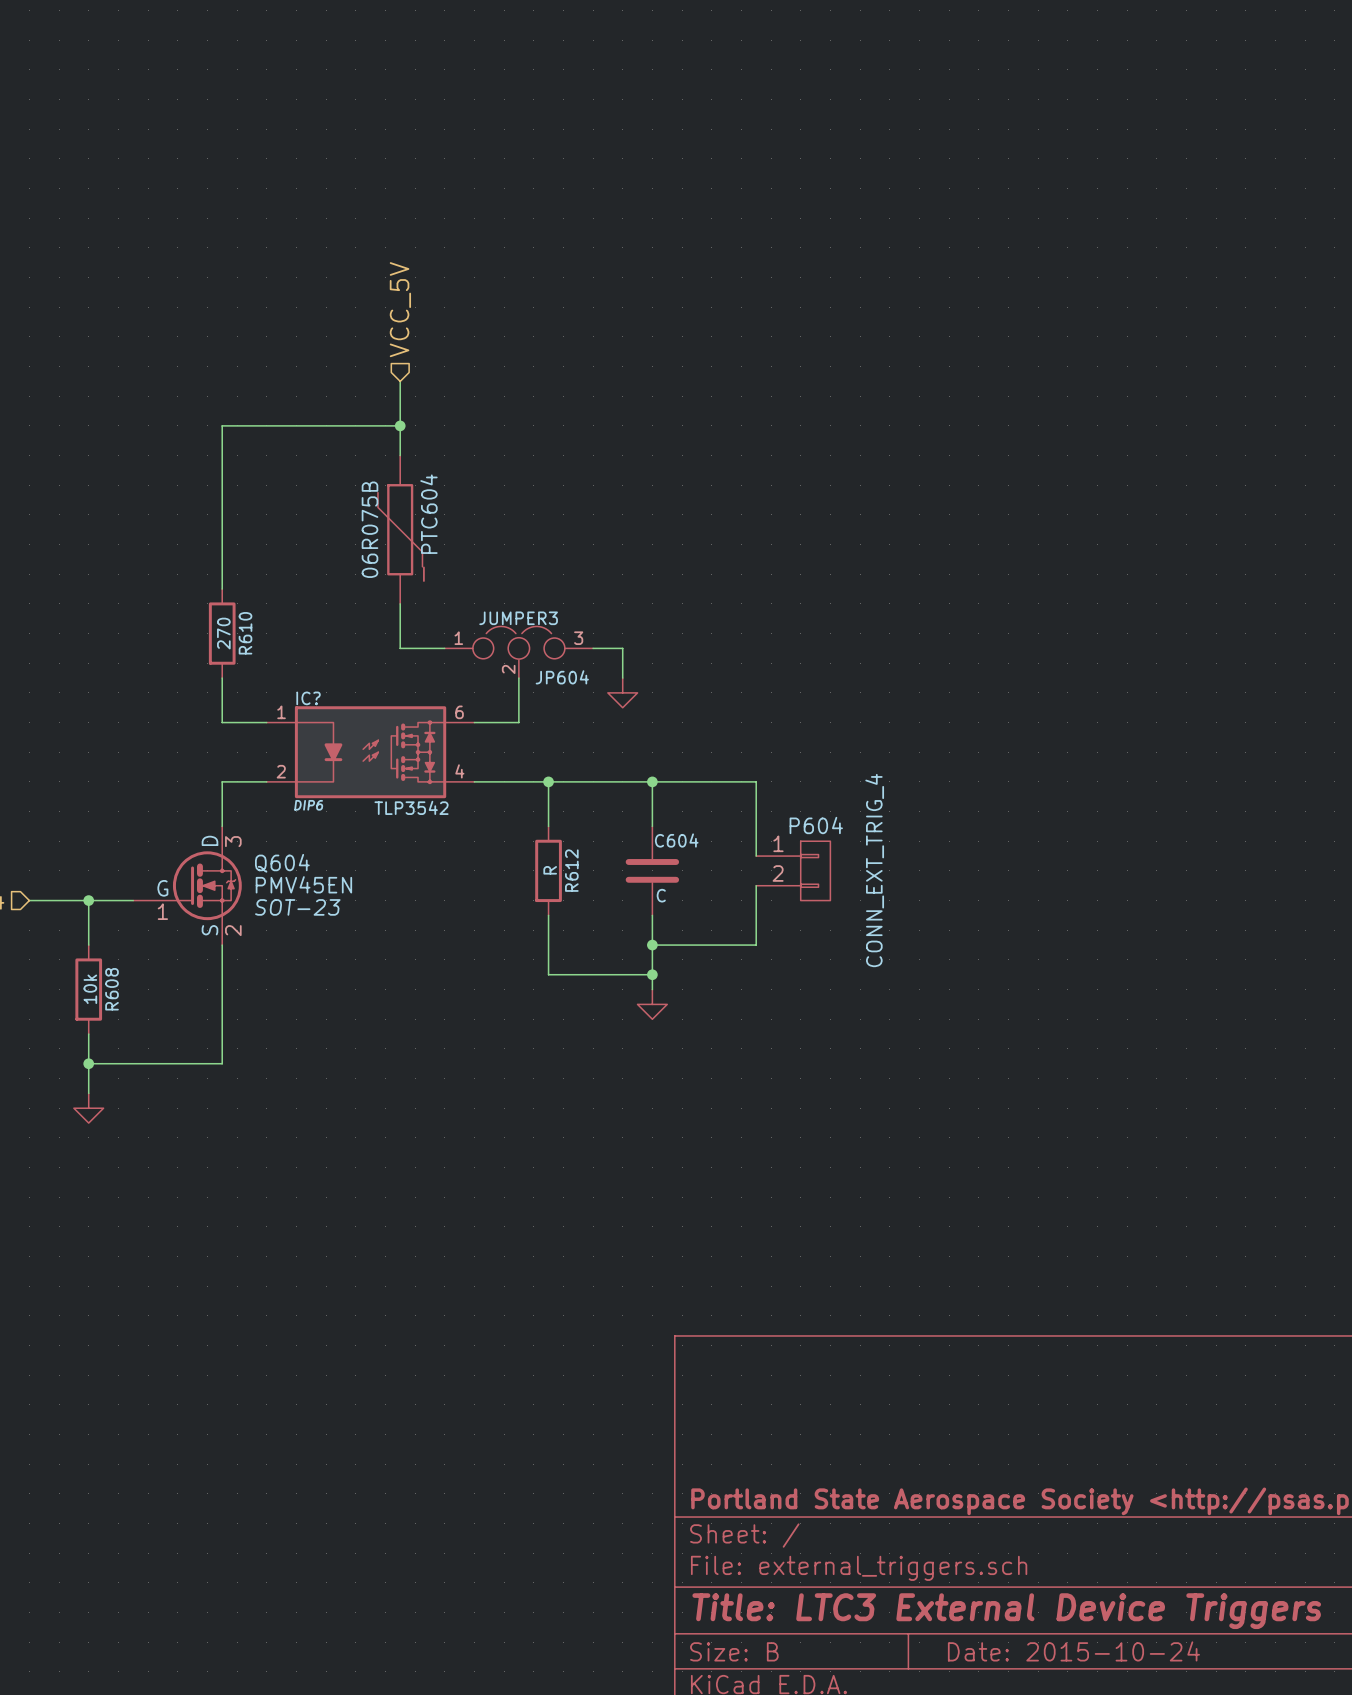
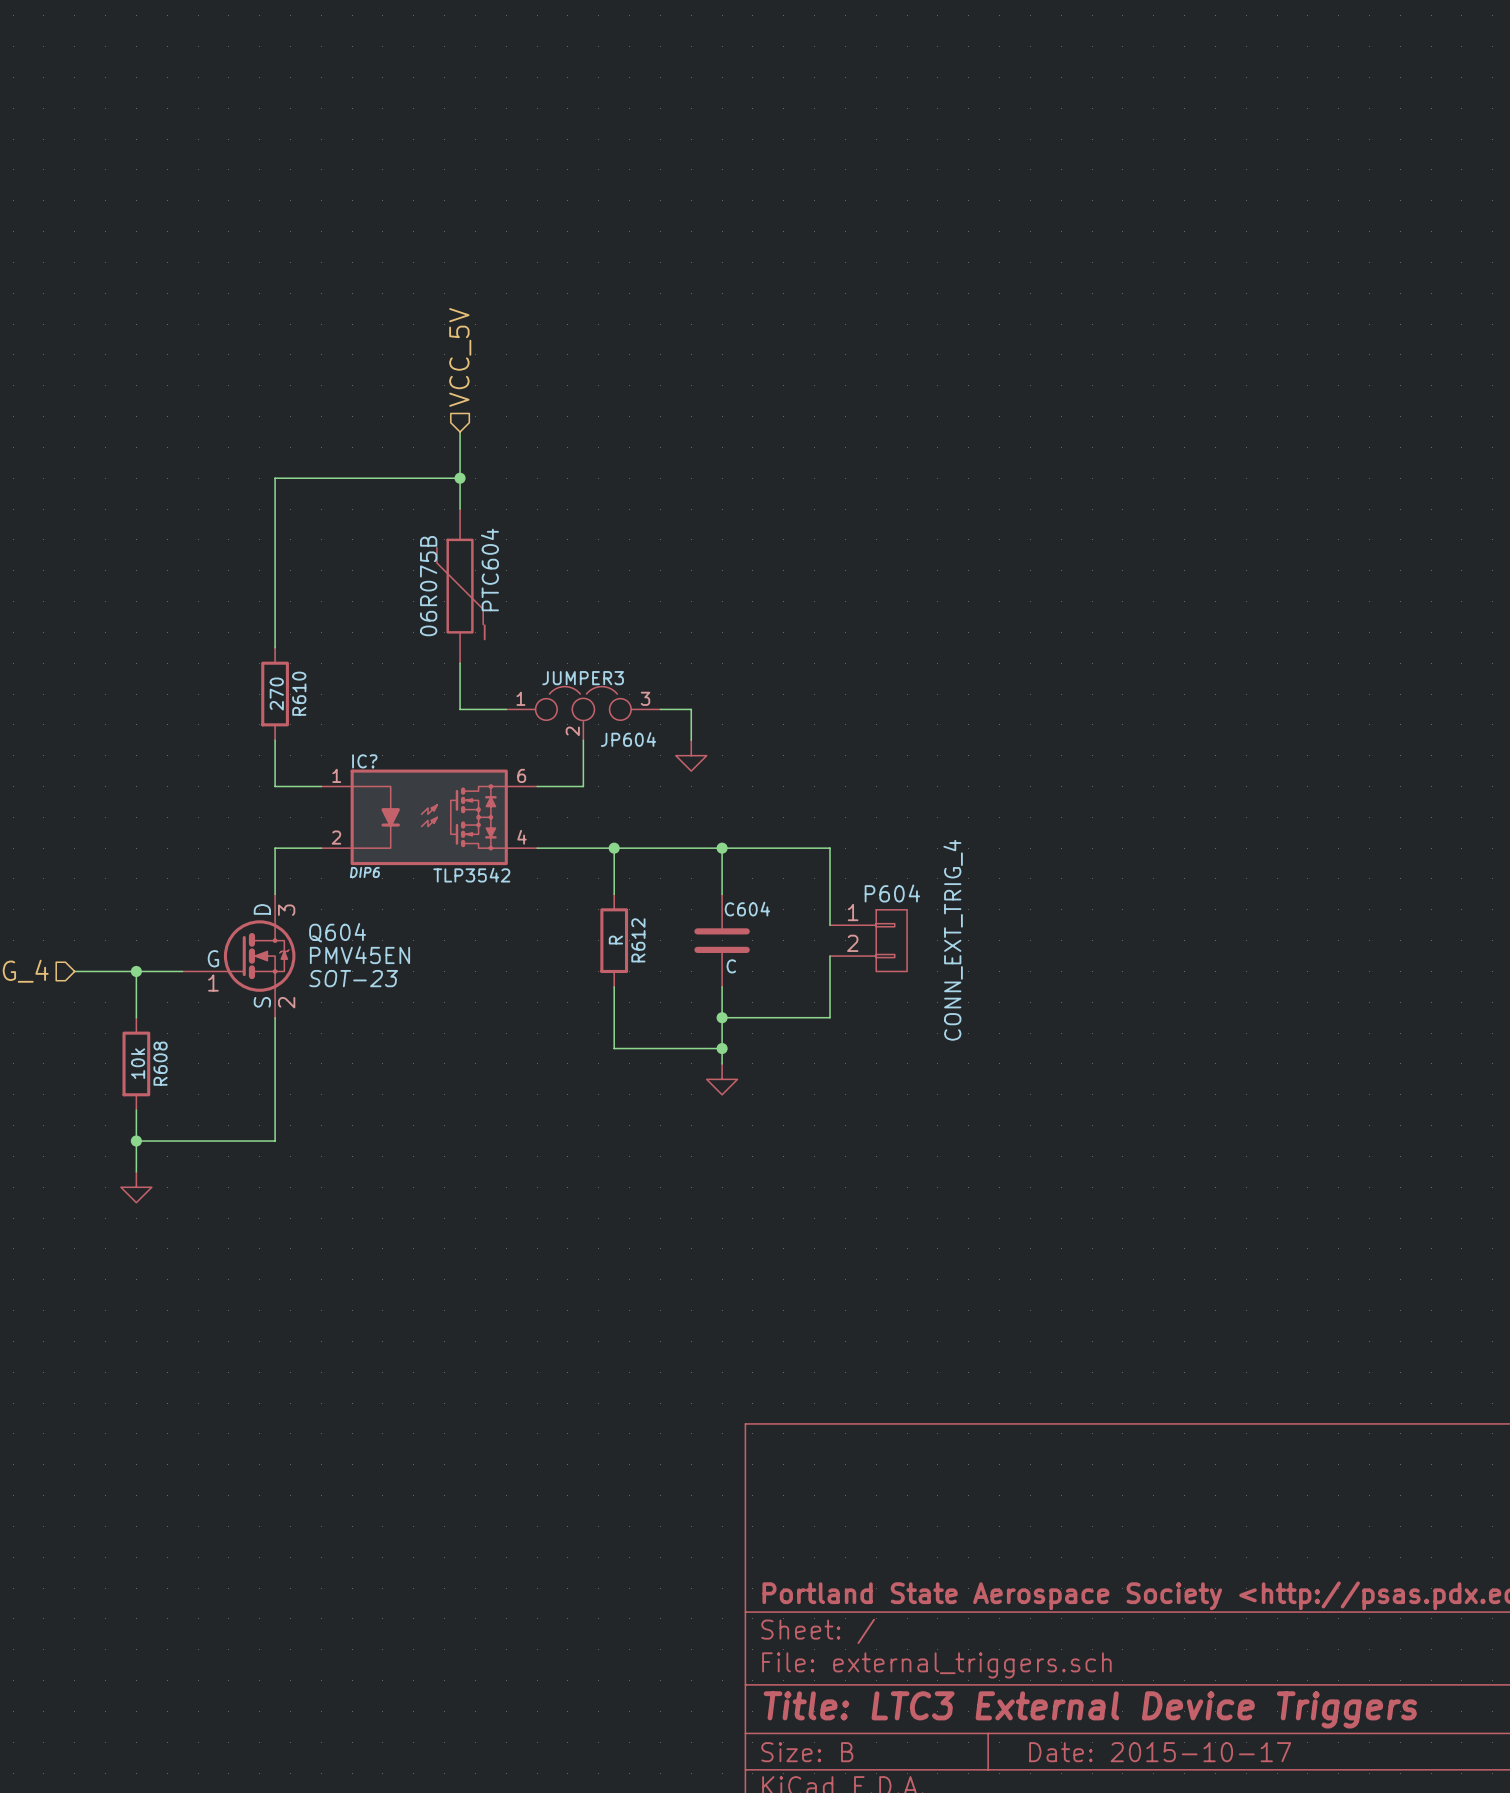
title block: Date: 2015-10-24 (1073, 1651) -> Date: 2015-10-17 (1160, 1752)

